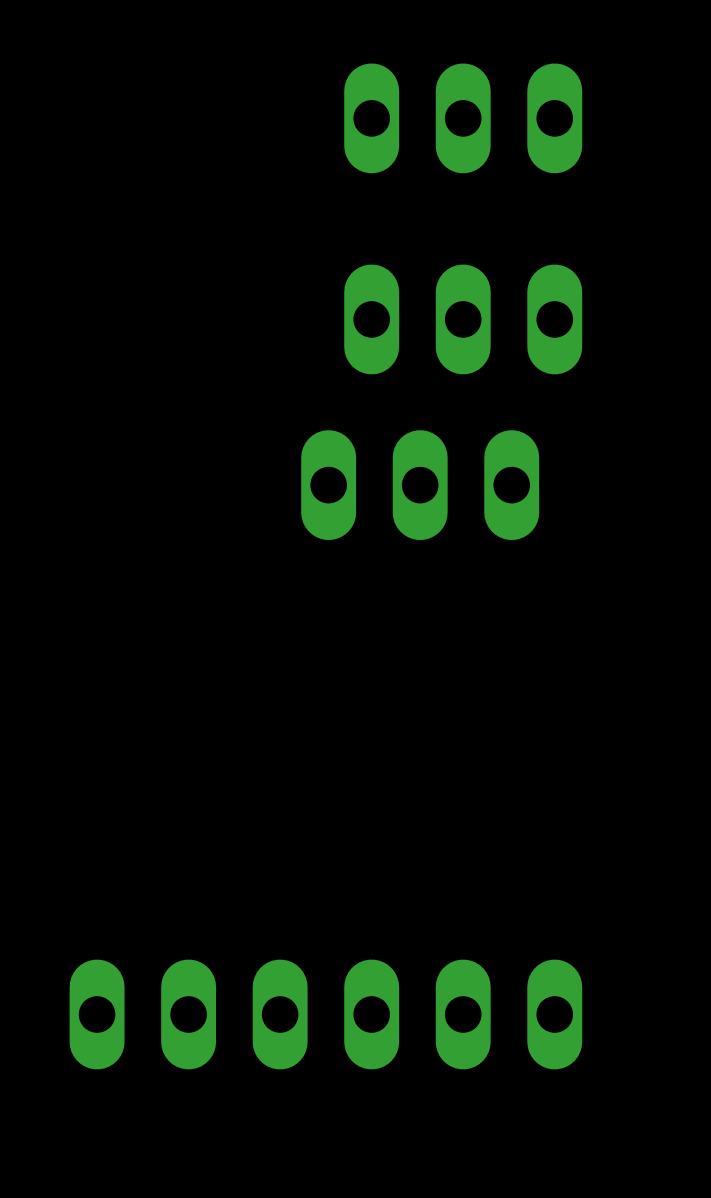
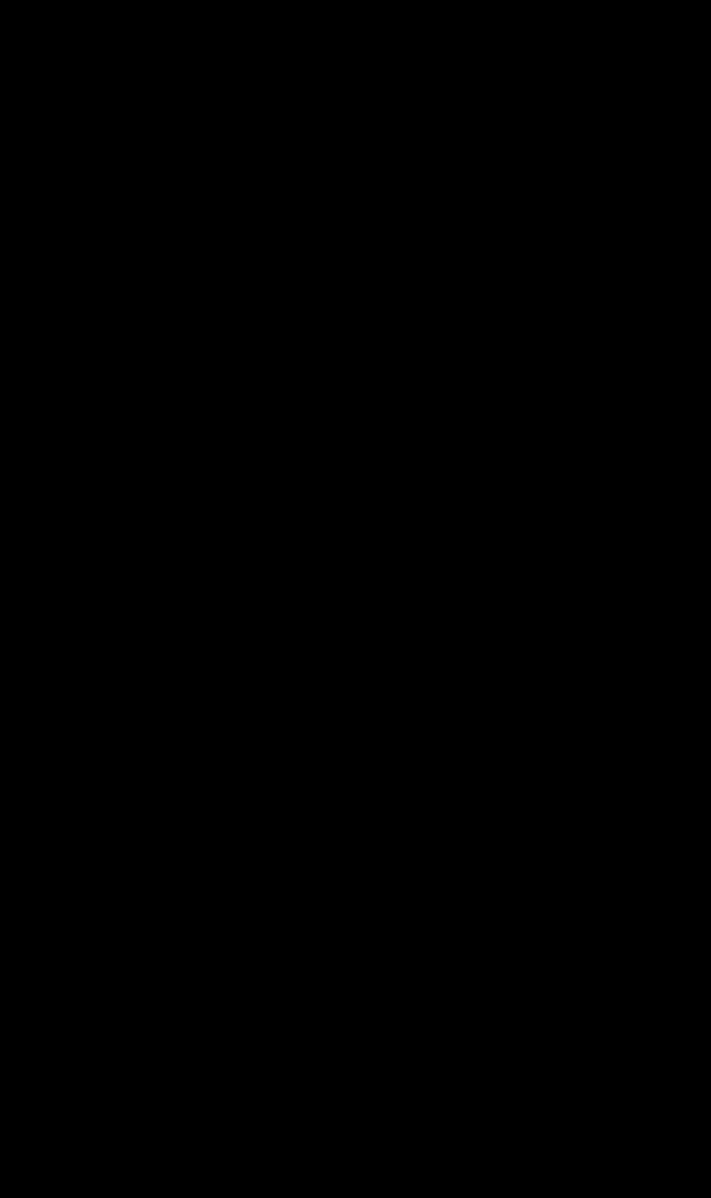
part: (463, 118) -> none
part: (463, 319) -> none
part: (420, 485) -> none
part: (325, 1014) -> none

